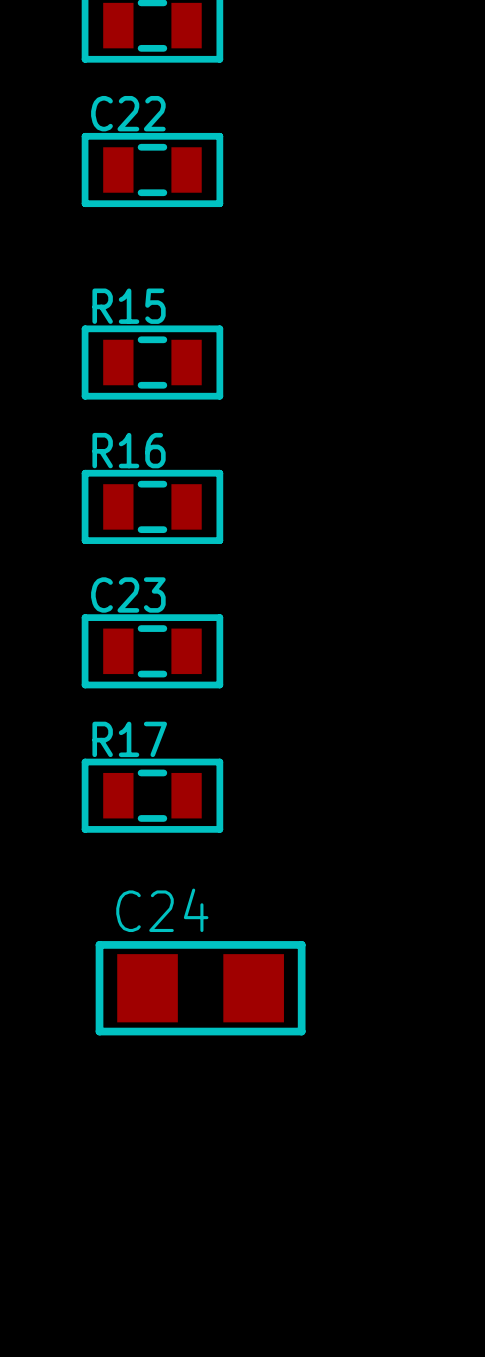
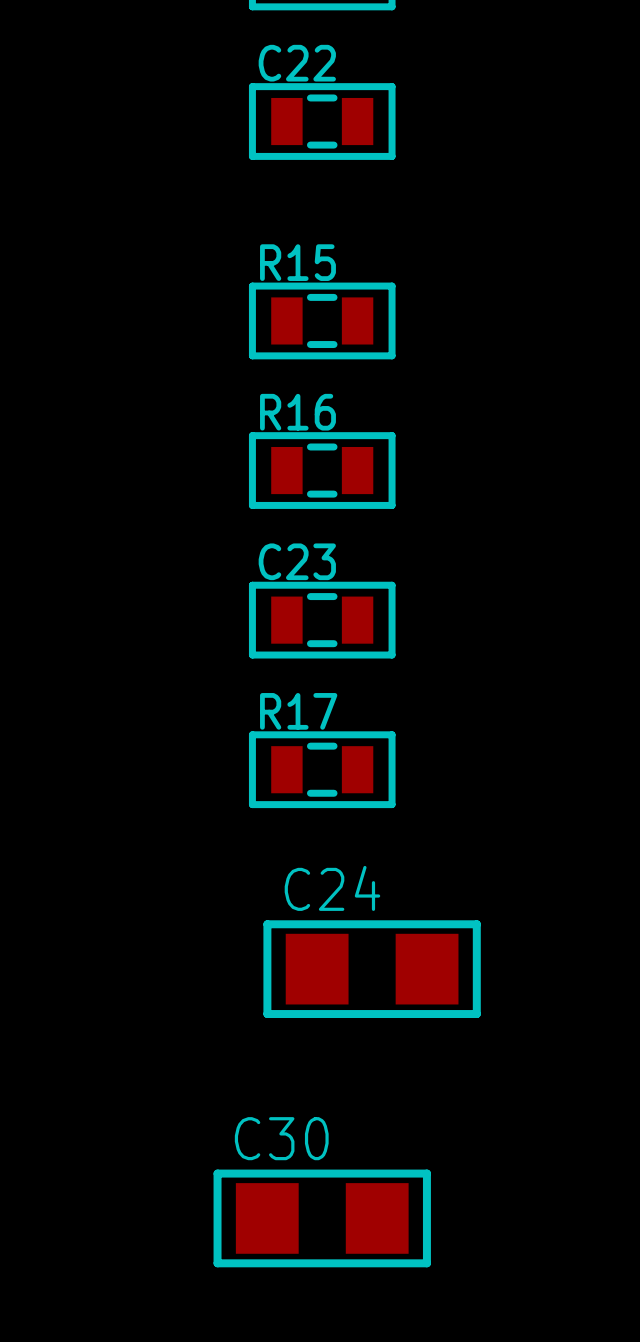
C30: none -> (322, 1218)

